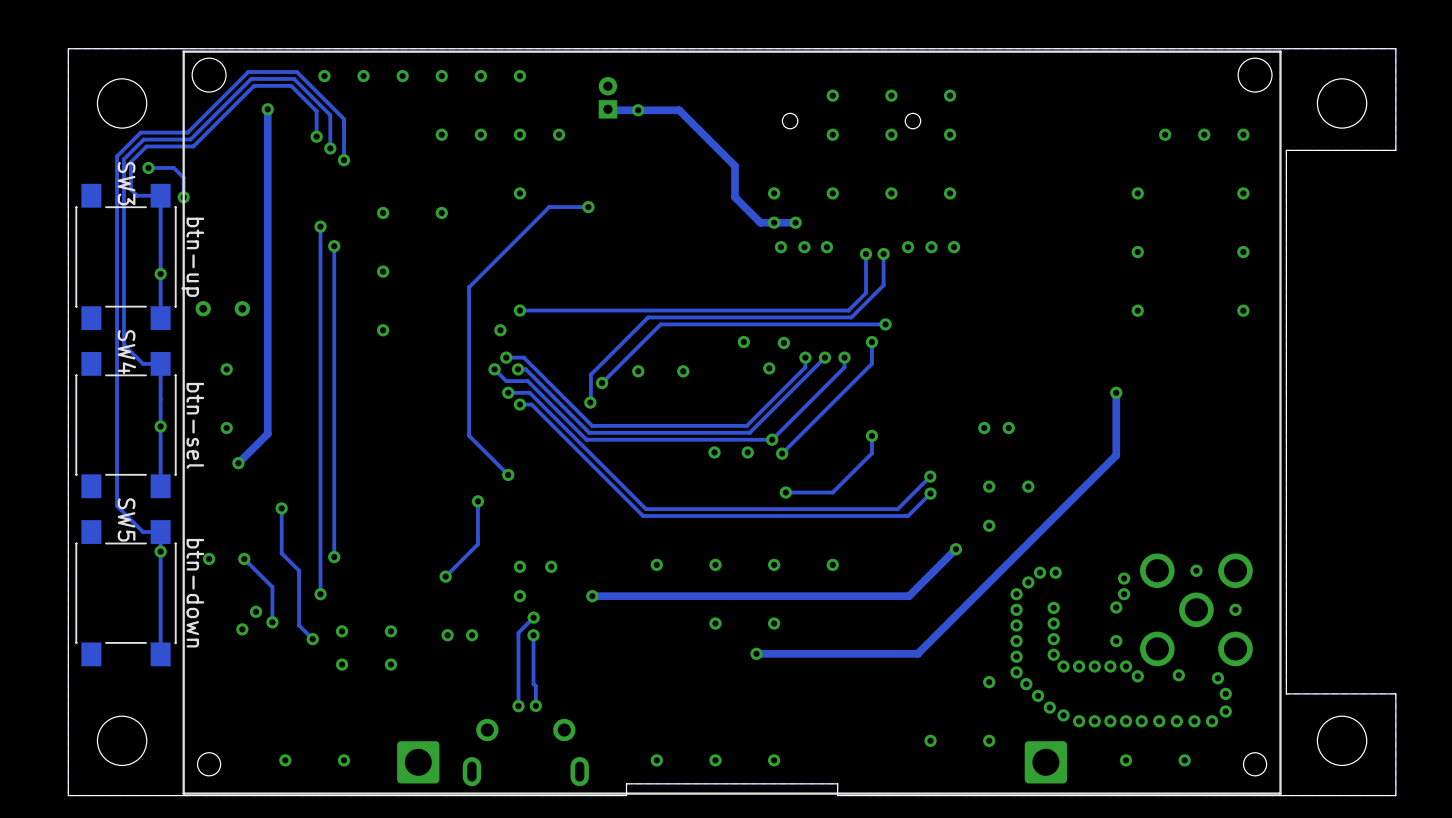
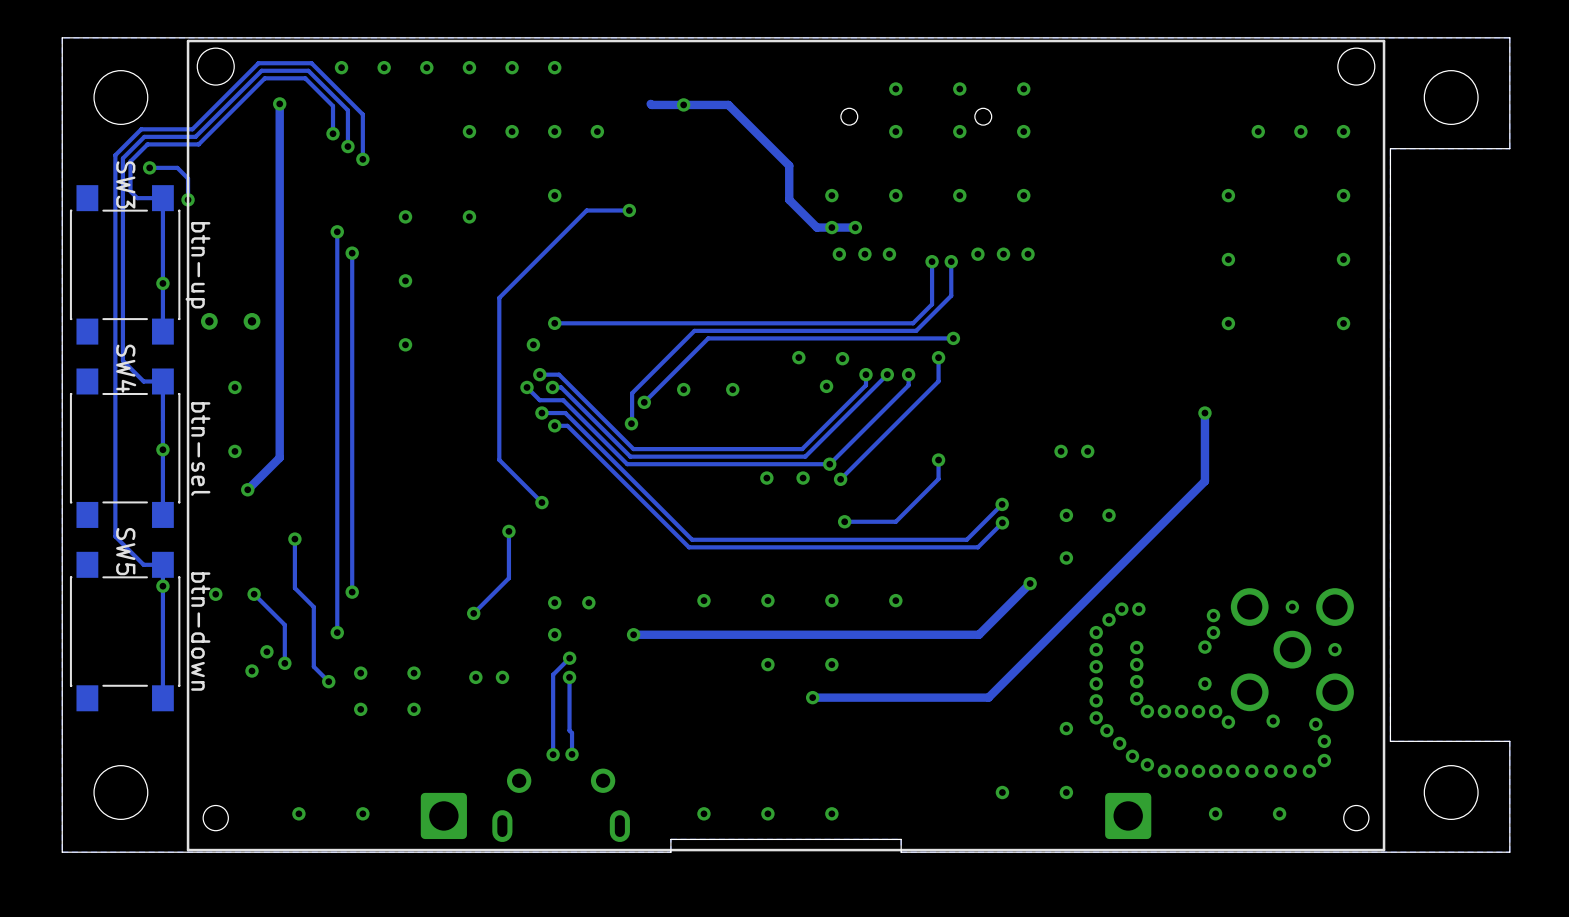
part: (607, 97) -> none

